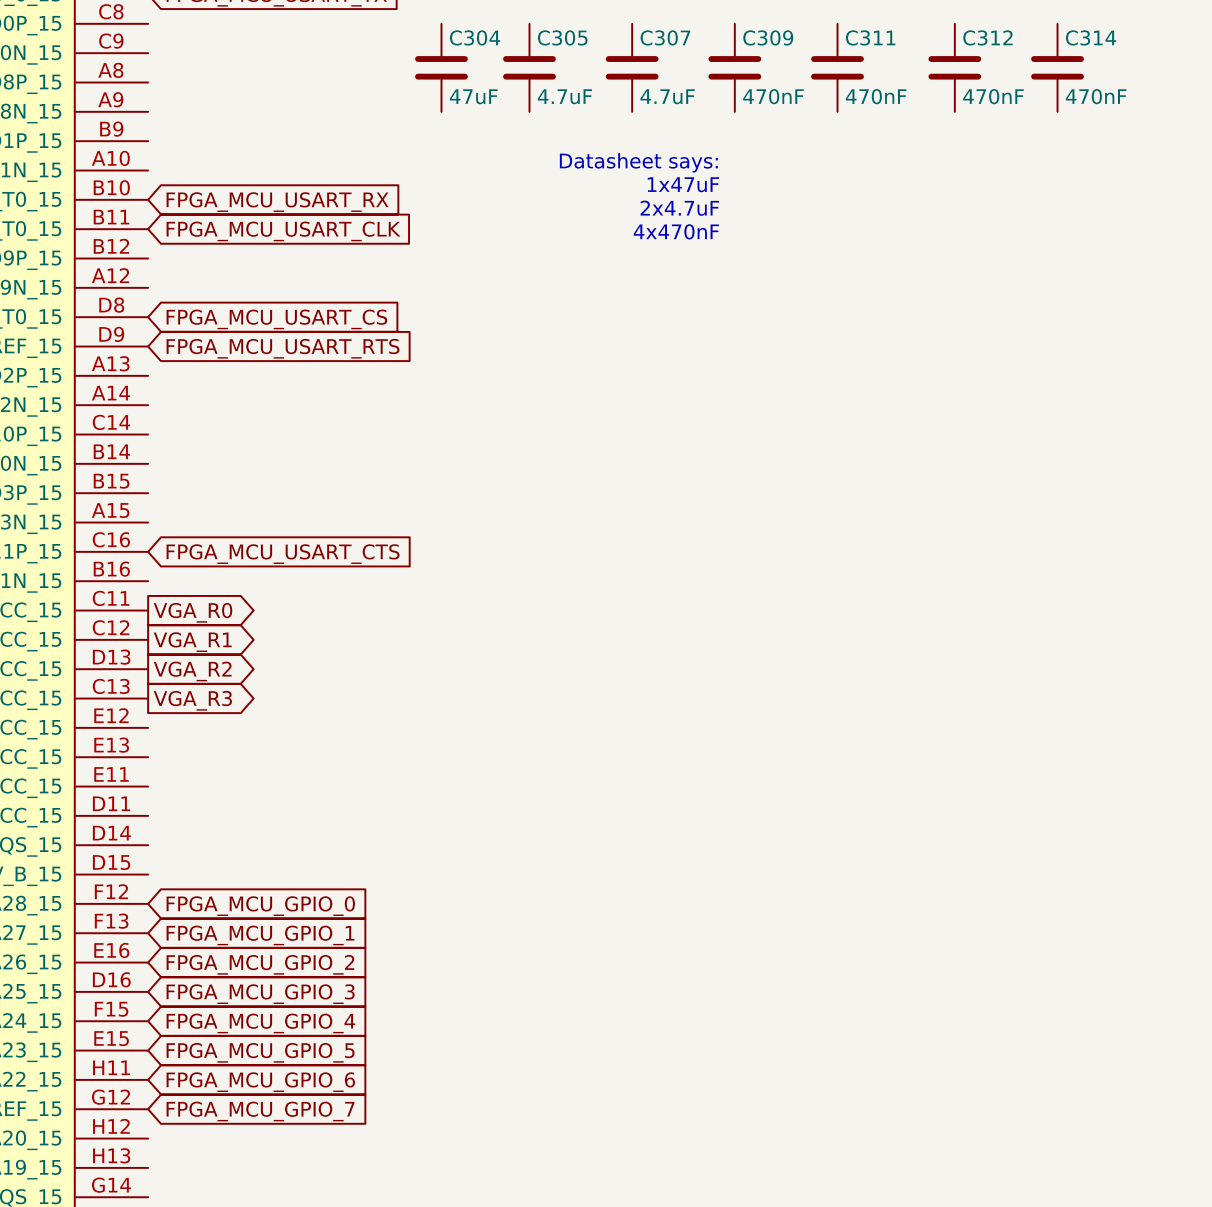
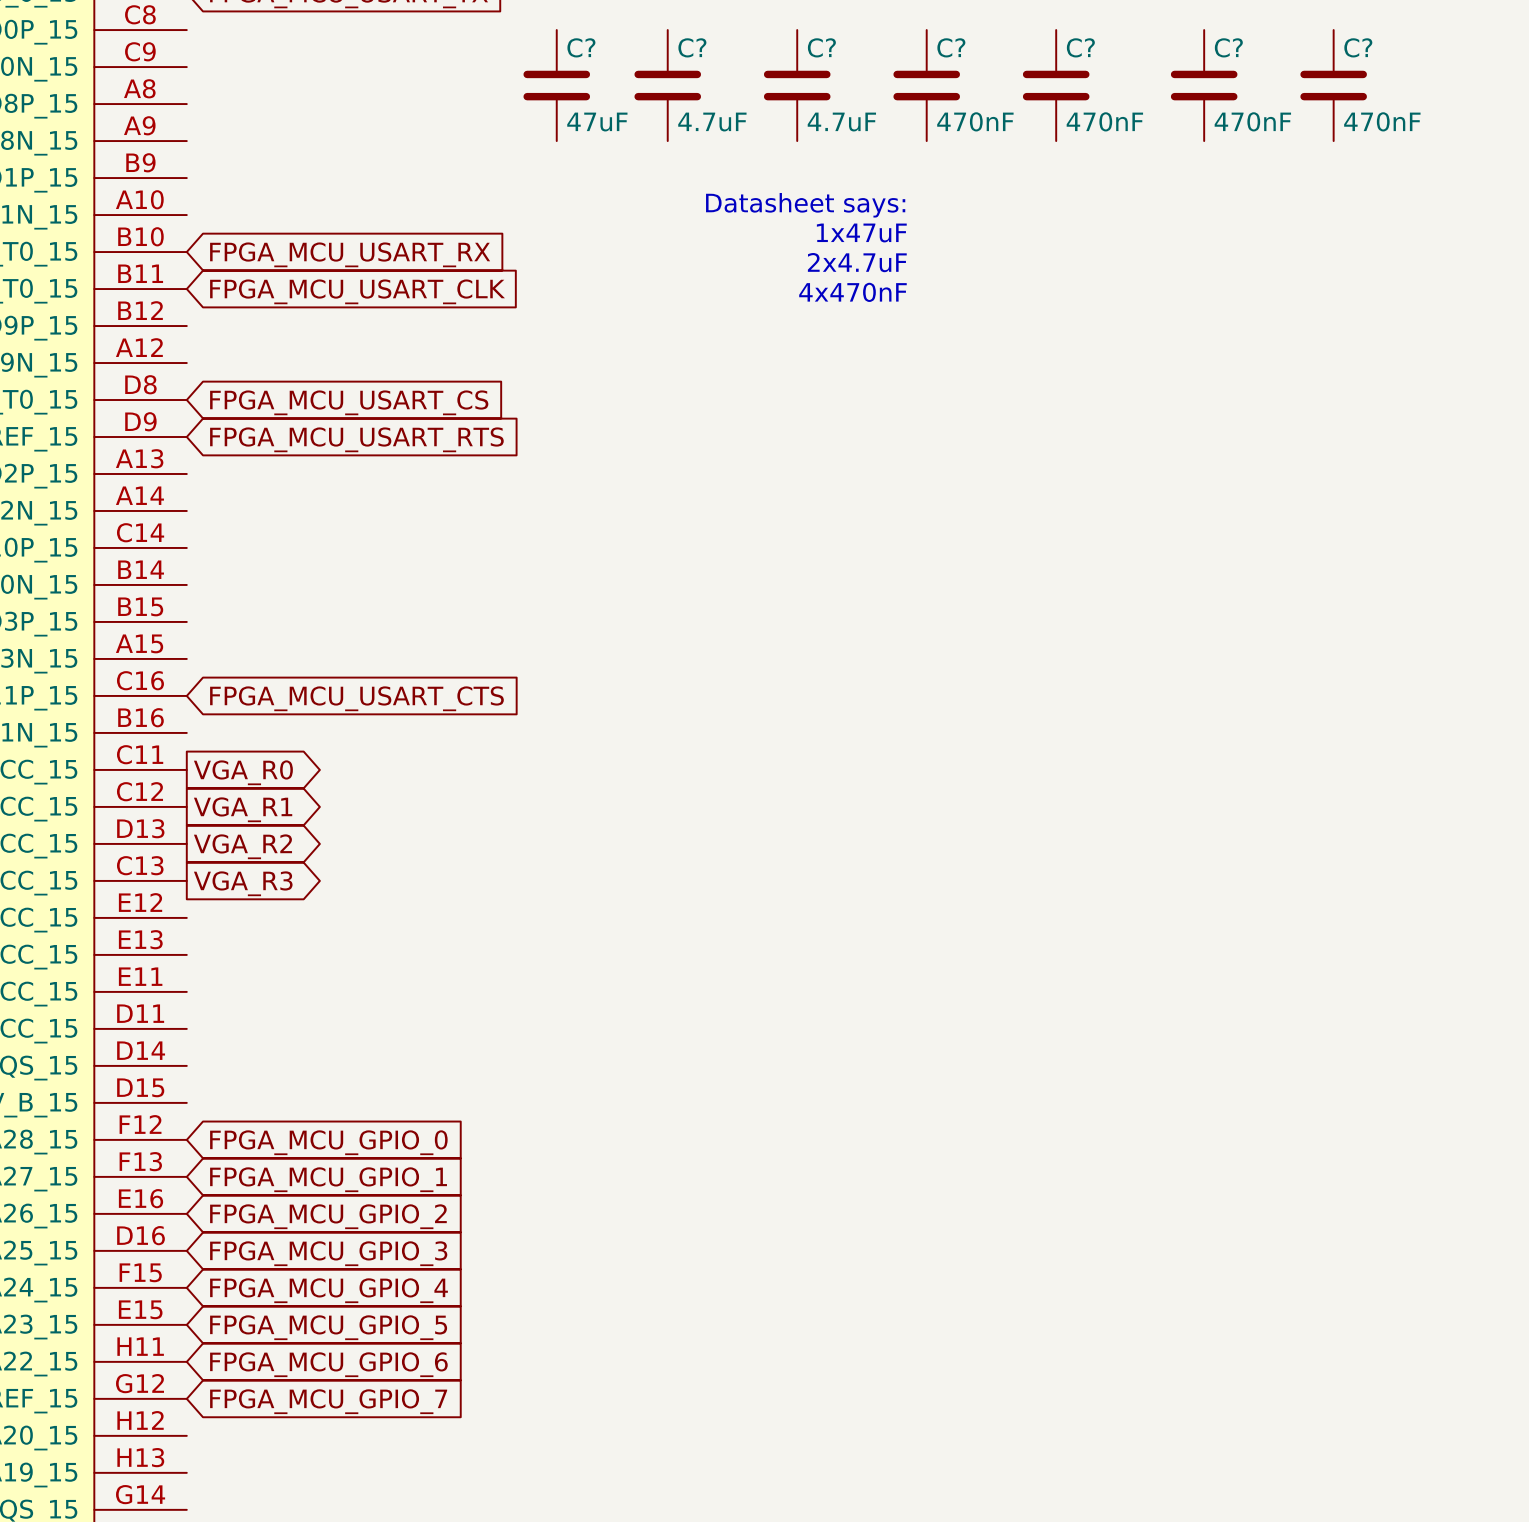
C304 name: C304 (475, 37) -> C? (581, 47)
C305 name: C305 (562, 37) -> C? (692, 47)
C307 name: C307 (665, 37) -> C? (821, 47)
C309 name: C309 (768, 37) -> C? (951, 47)
C311 name: C311 (870, 37) -> C? (1080, 47)
C312 name: C312 (987, 37) -> C? (1228, 47)
C314 name: C314 (1091, 37) -> C? (1358, 47)

